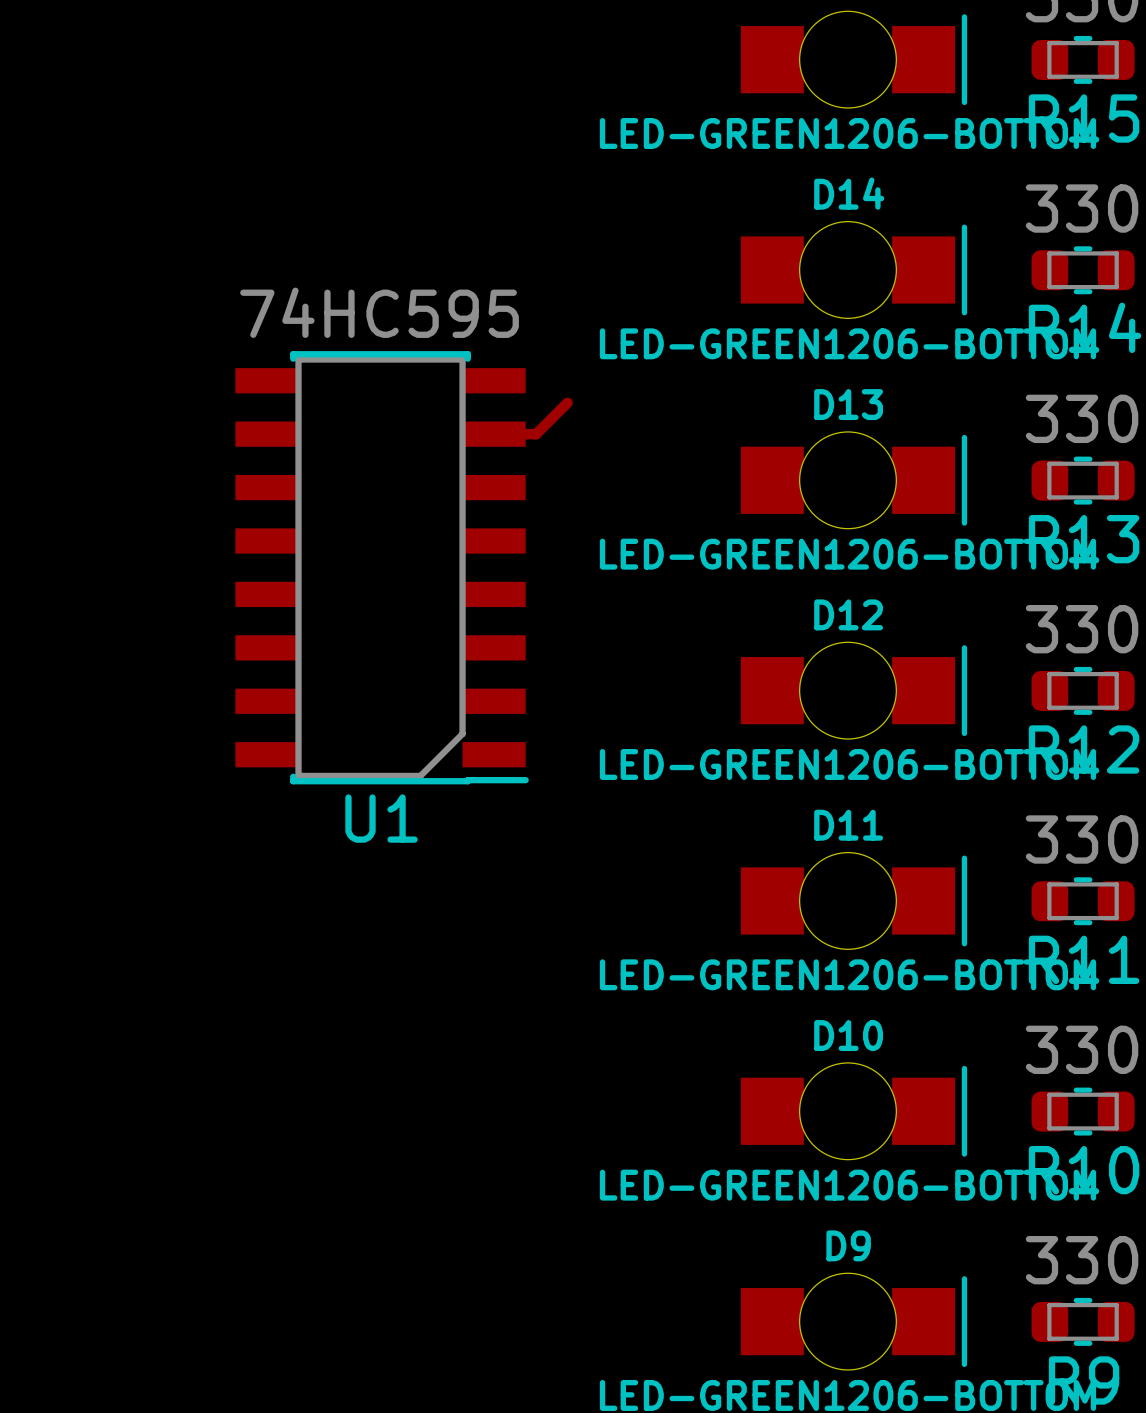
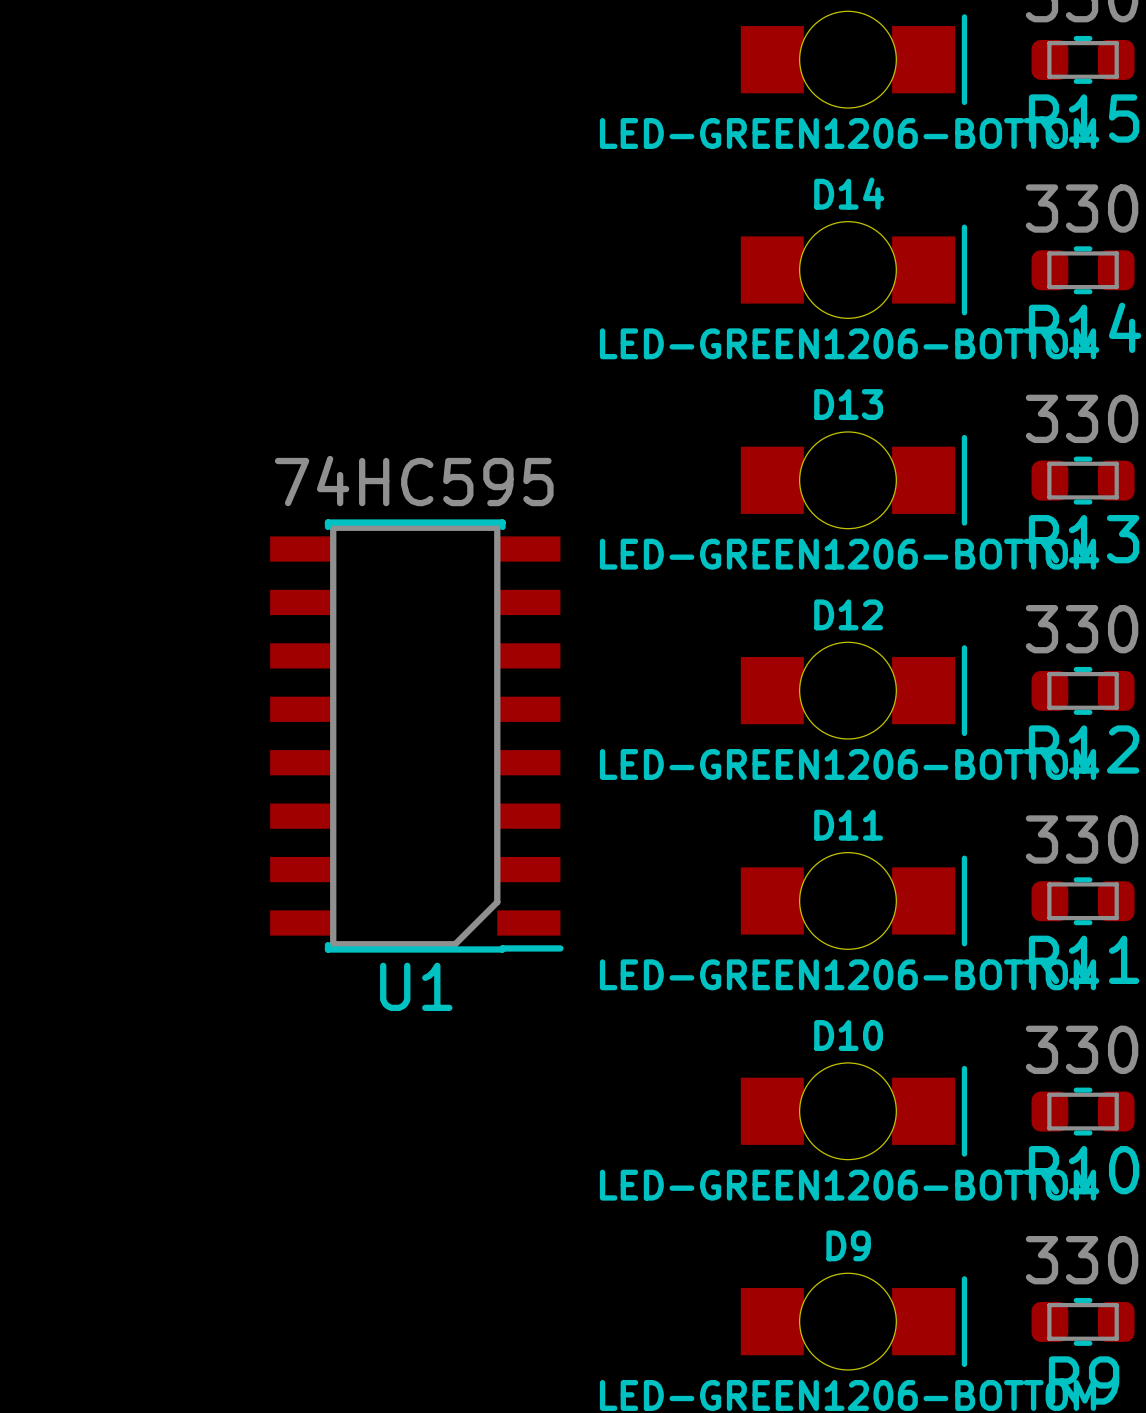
top track: (567, 402) (536, 434) (494, 434) -> none
U1 position: (382, 567) -> (416, 736)

